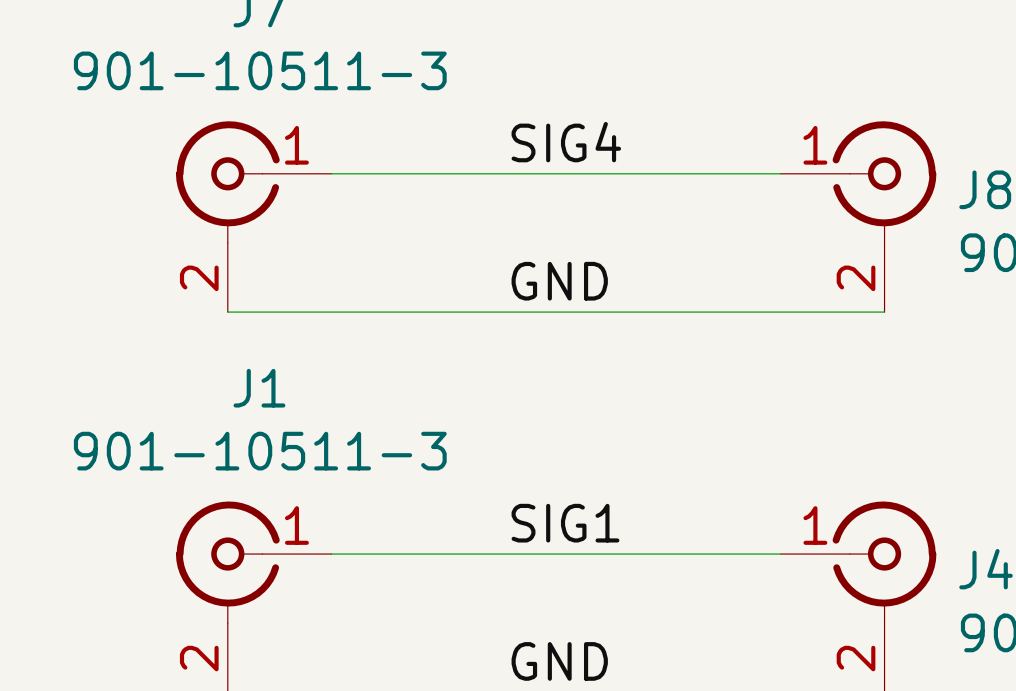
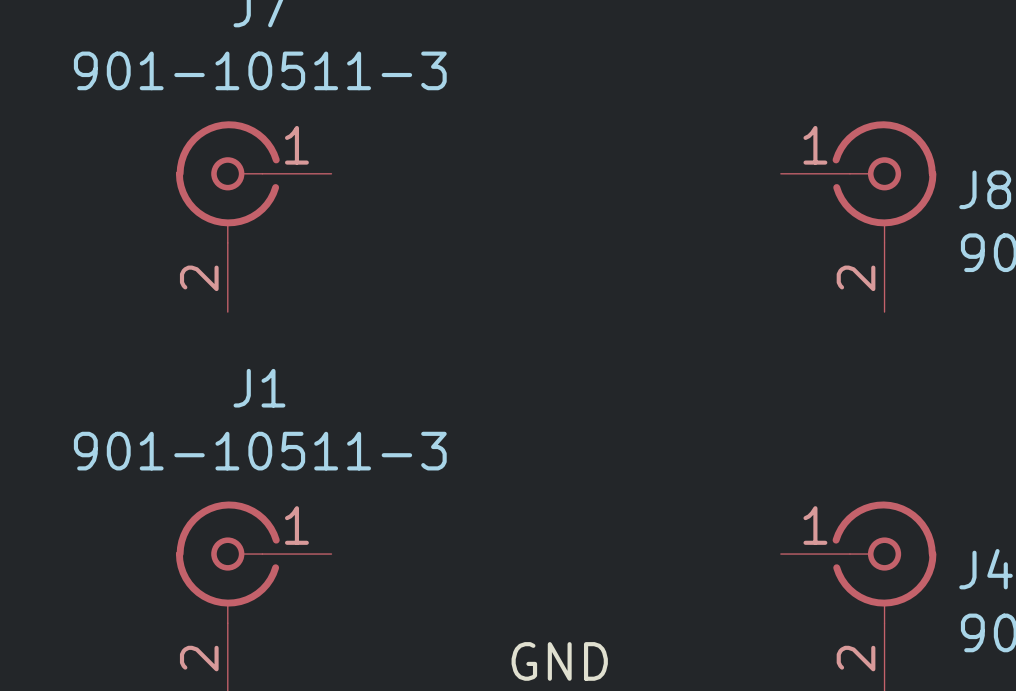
label: SIG4 (566, 142) -> none
wire: (331, 173) (780, 173) -> none
label: GND (559, 281) -> none
wire: (227, 312) (884, 312) -> none
label: SIG1 (565, 523) -> none
wire: (331, 554) (780, 554) -> none

